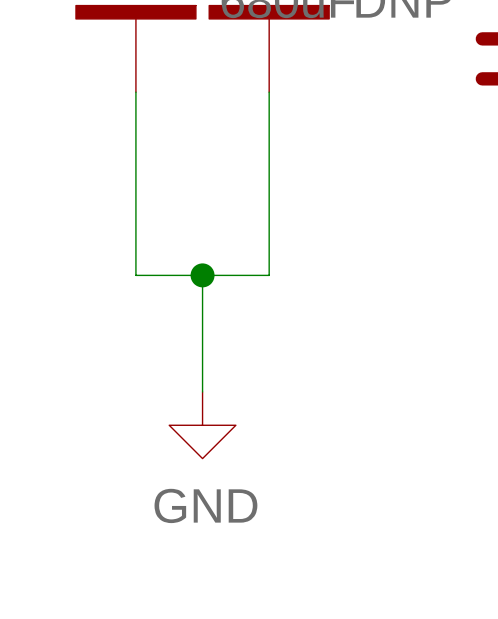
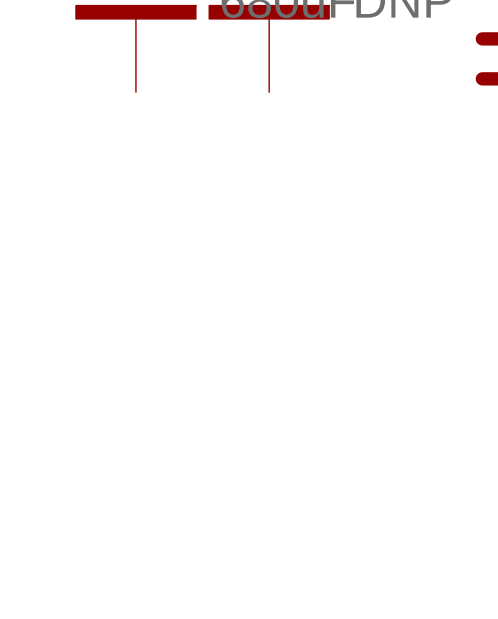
wire: (135, 92) (135, 275) (269, 275) (269, 92) -> none
wire: (202, 275) (202, 391) -> none
junction: (202, 275) -> none
power symbol: GND (202, 425) -> none

